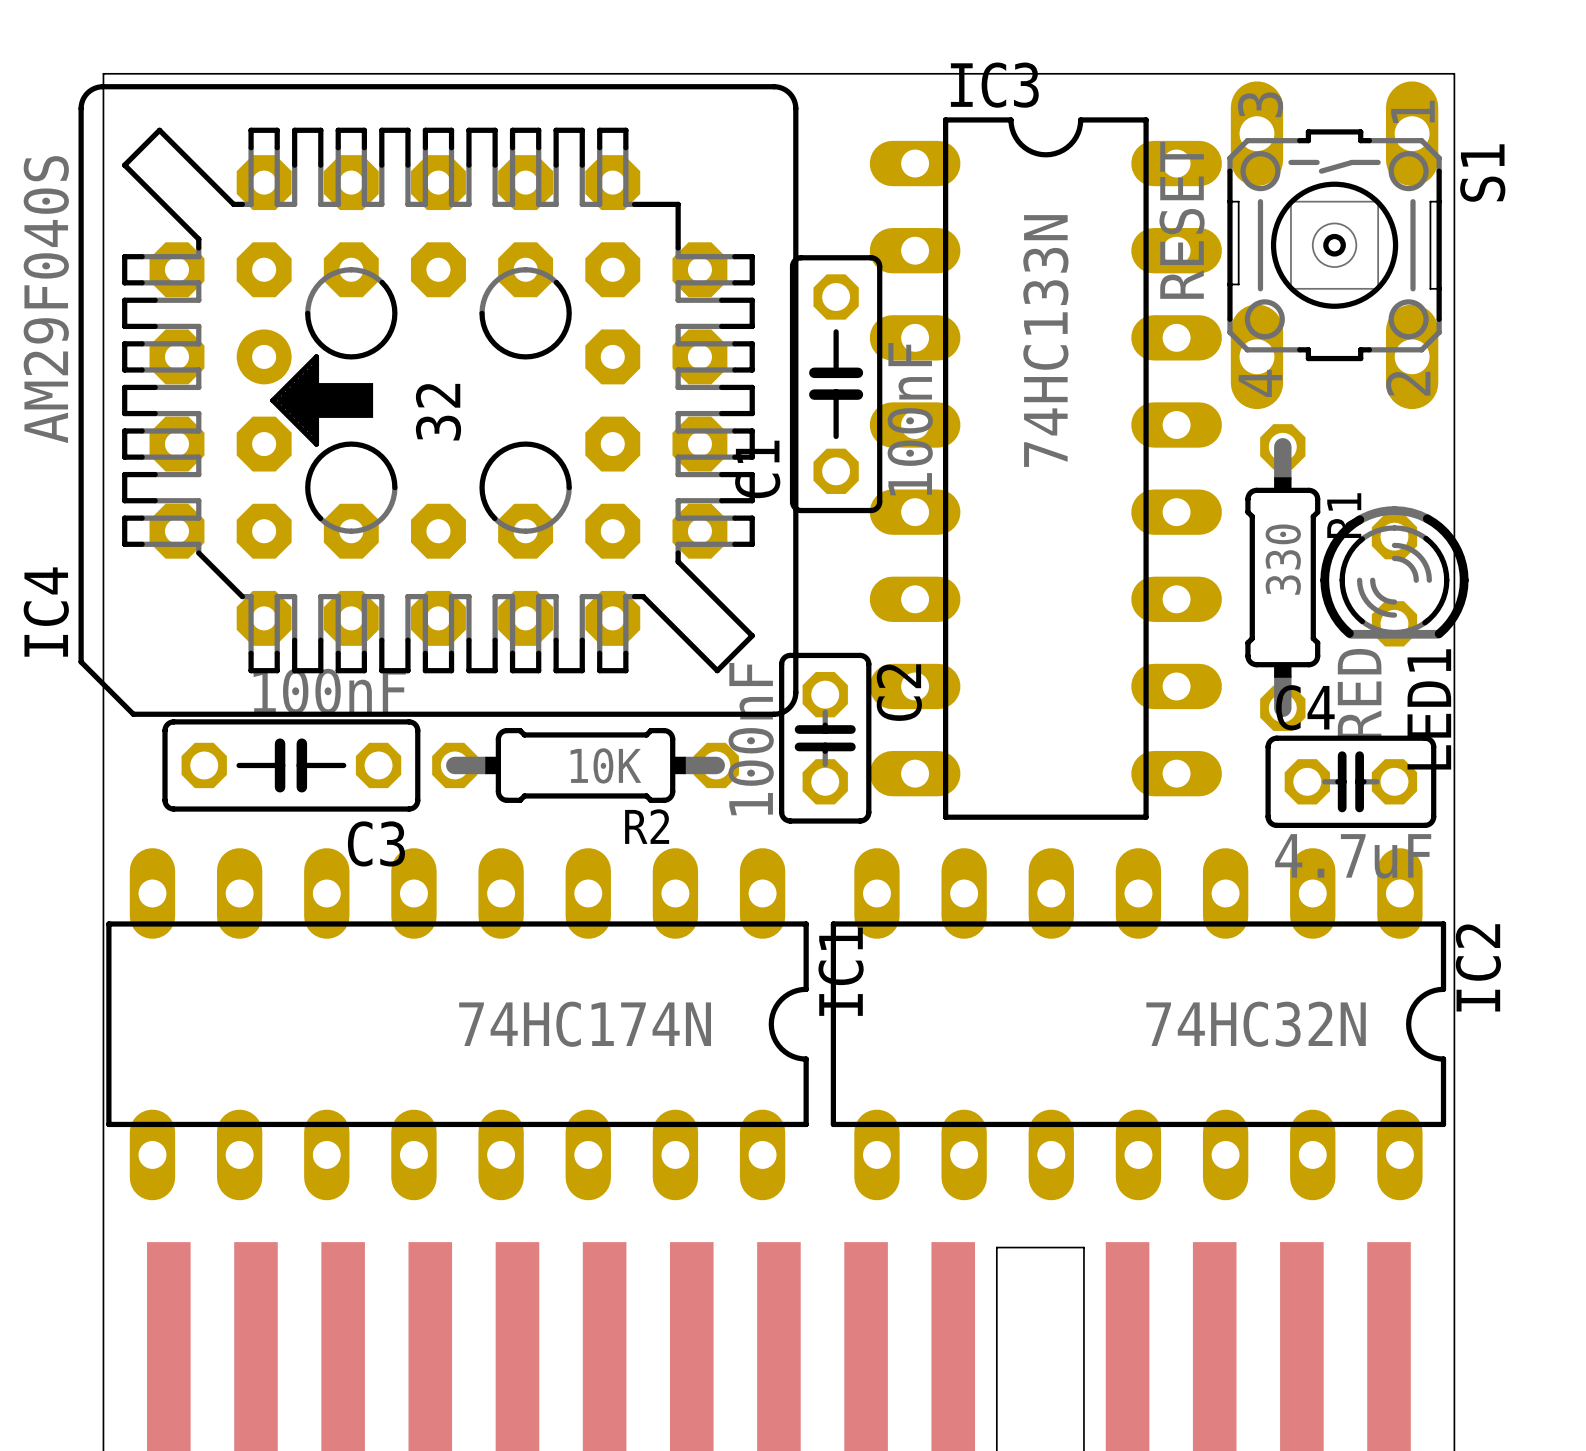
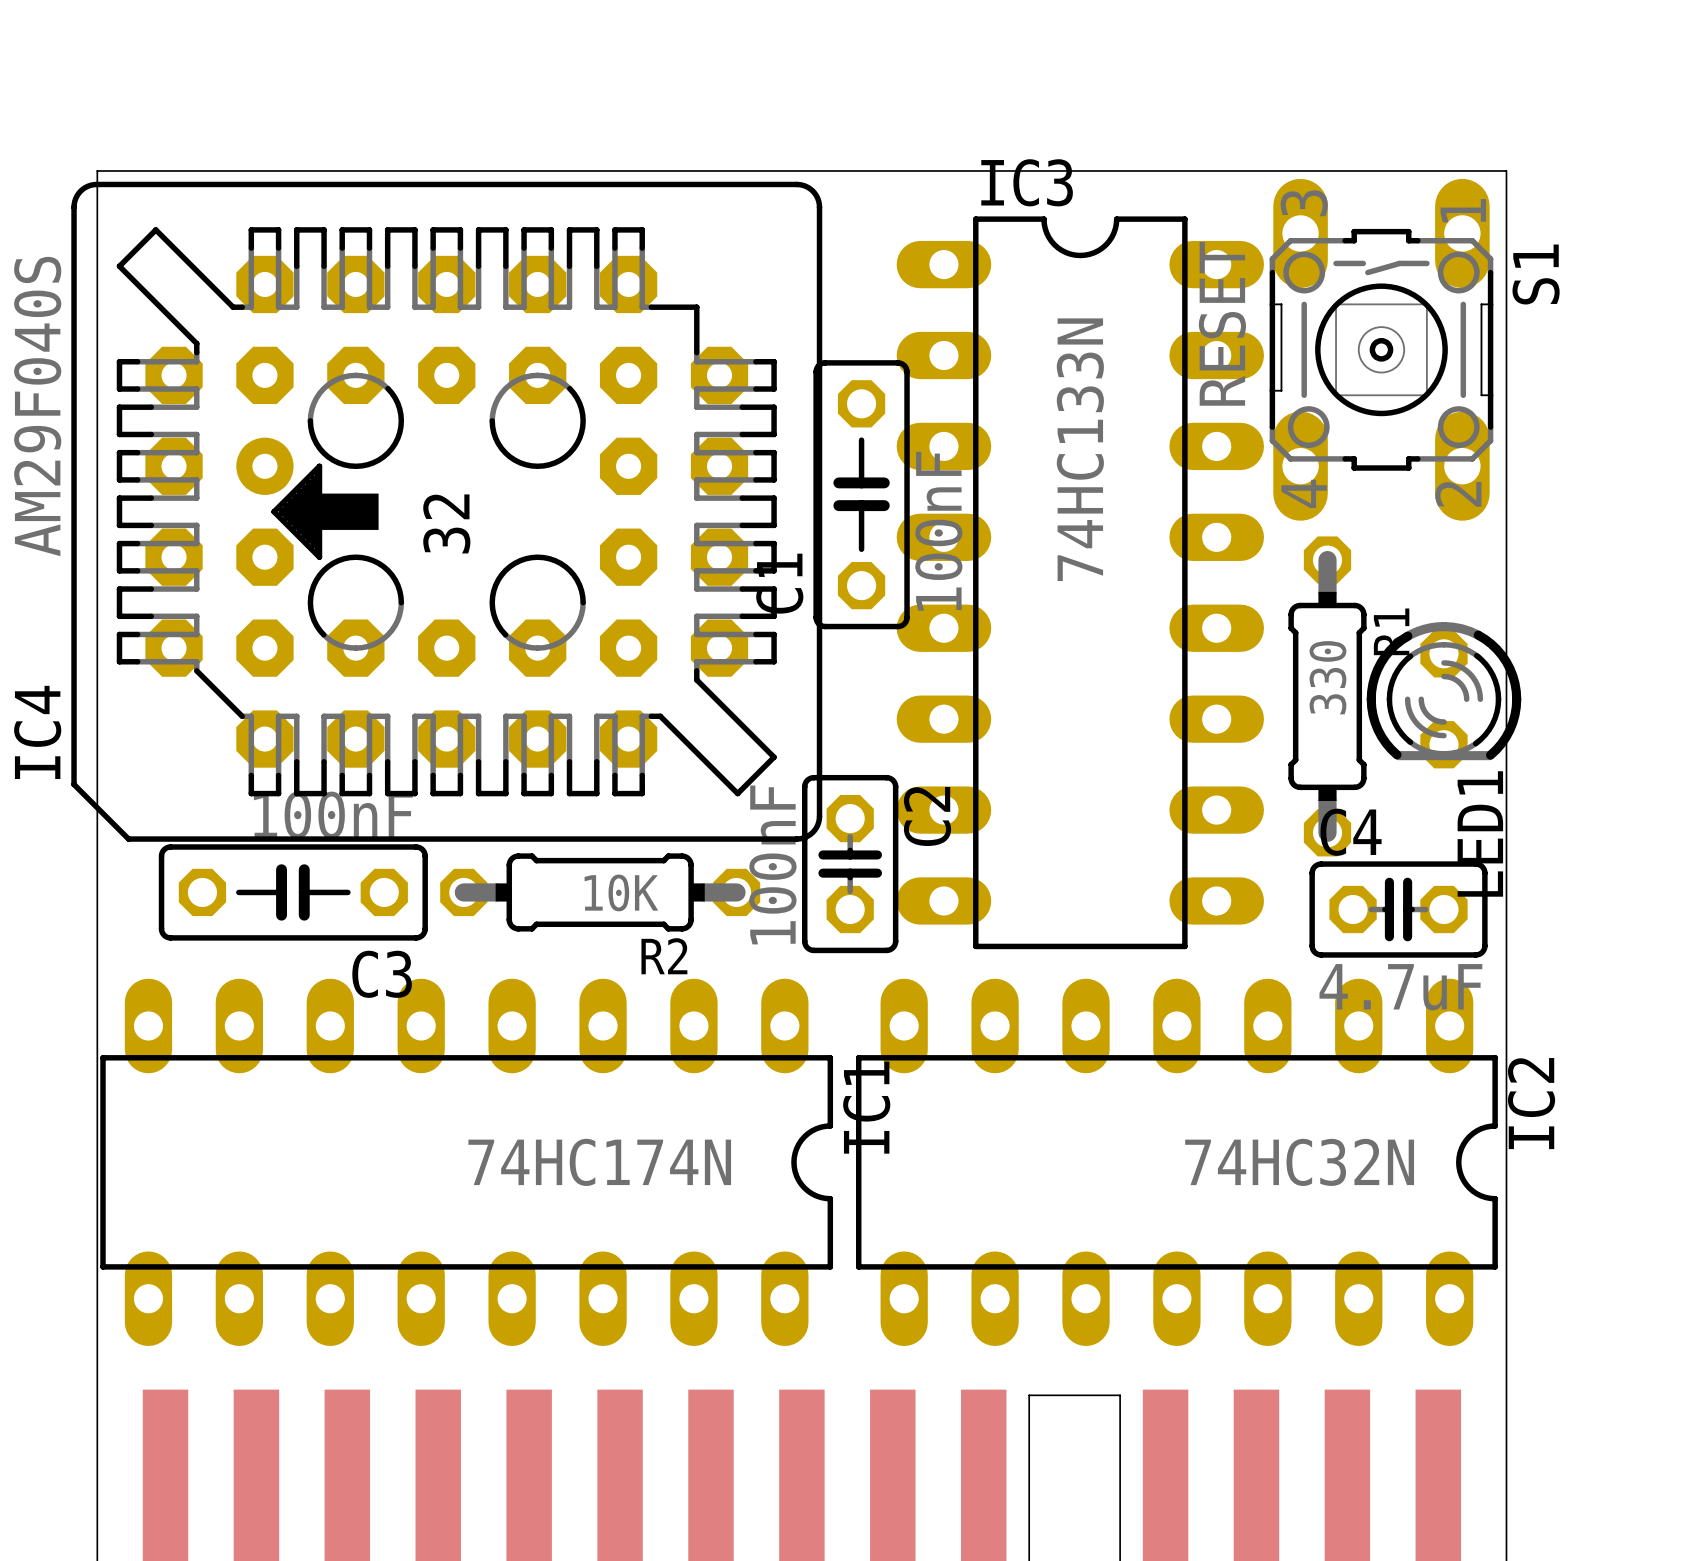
LED1 value: RED (1359, 693) -> none

